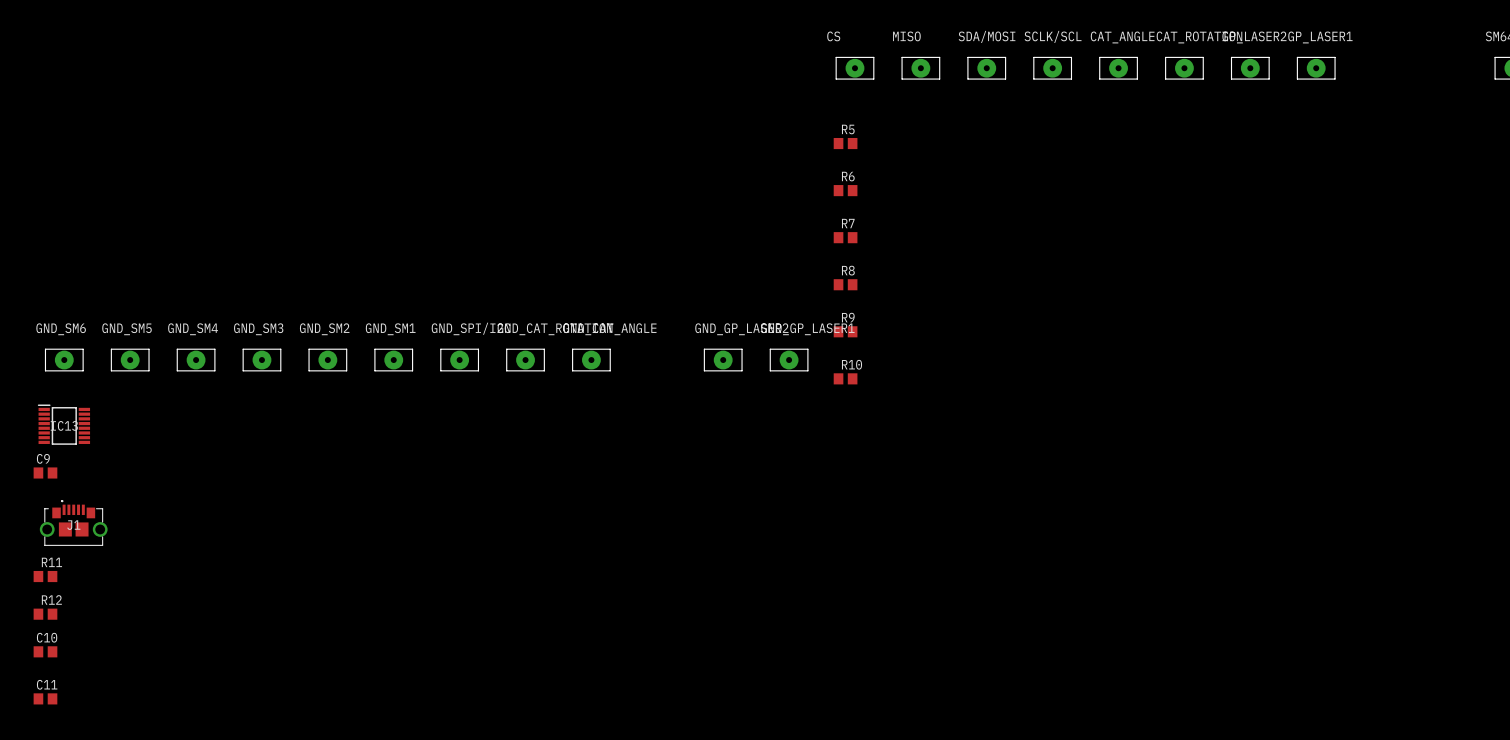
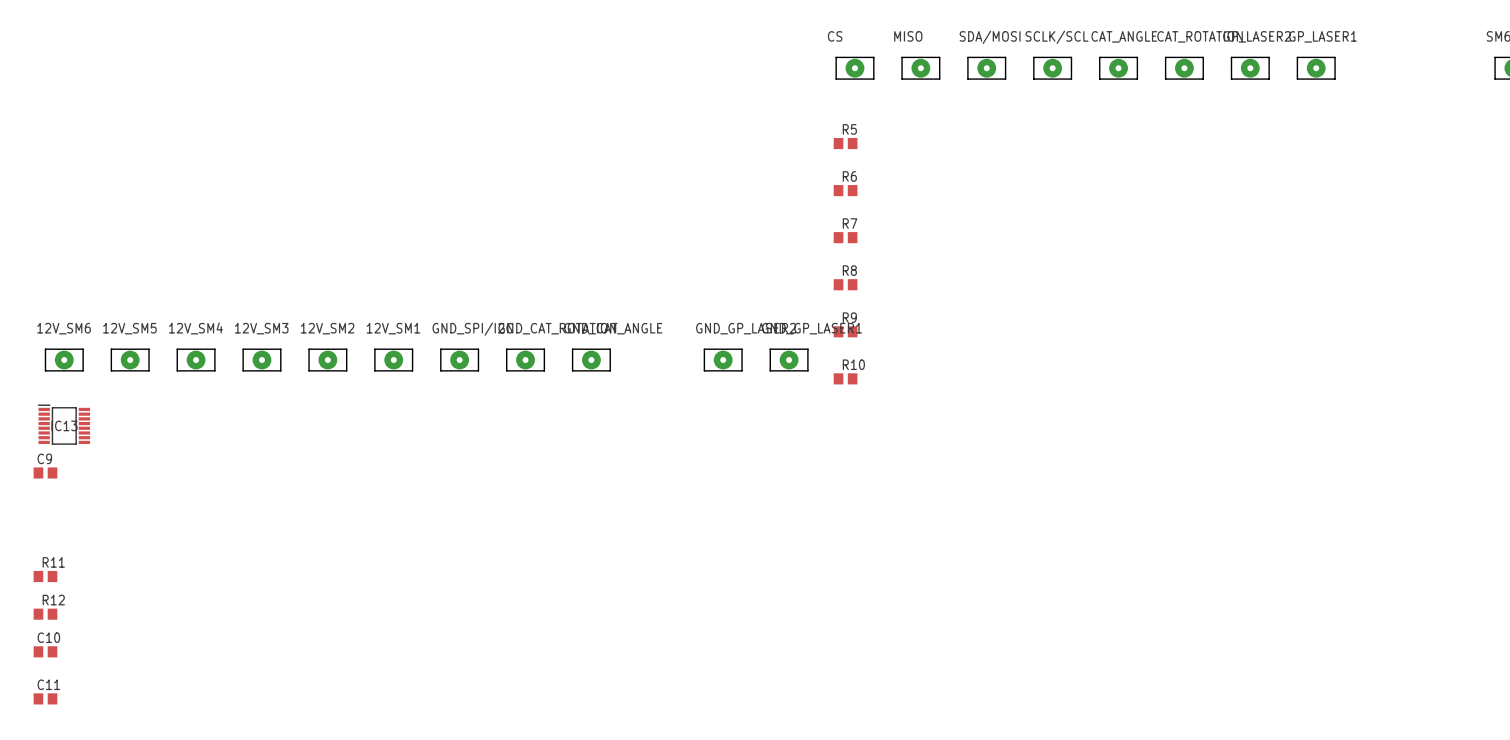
GND_SM6 name: GND_SM6 (61, 329) -> 12V_SM6 (64, 328)
GND_SM5 name: GND_SM5 (127, 329) -> 12V_SM5 (129, 328)
GND_SM4 name: GND_SM4 (193, 329) -> 12V_SM4 (196, 328)
GND_SM3 name: GND_SM3 (258, 329) -> 12V_SM3 (261, 328)
GND_SM2 name: GND_SM2 (324, 329) -> 12V_SM2 (327, 328)
GND_SM1 name: GND_SM1 (390, 329) -> 12V_SM1 (393, 328)
J1: (73, 522) -> none

